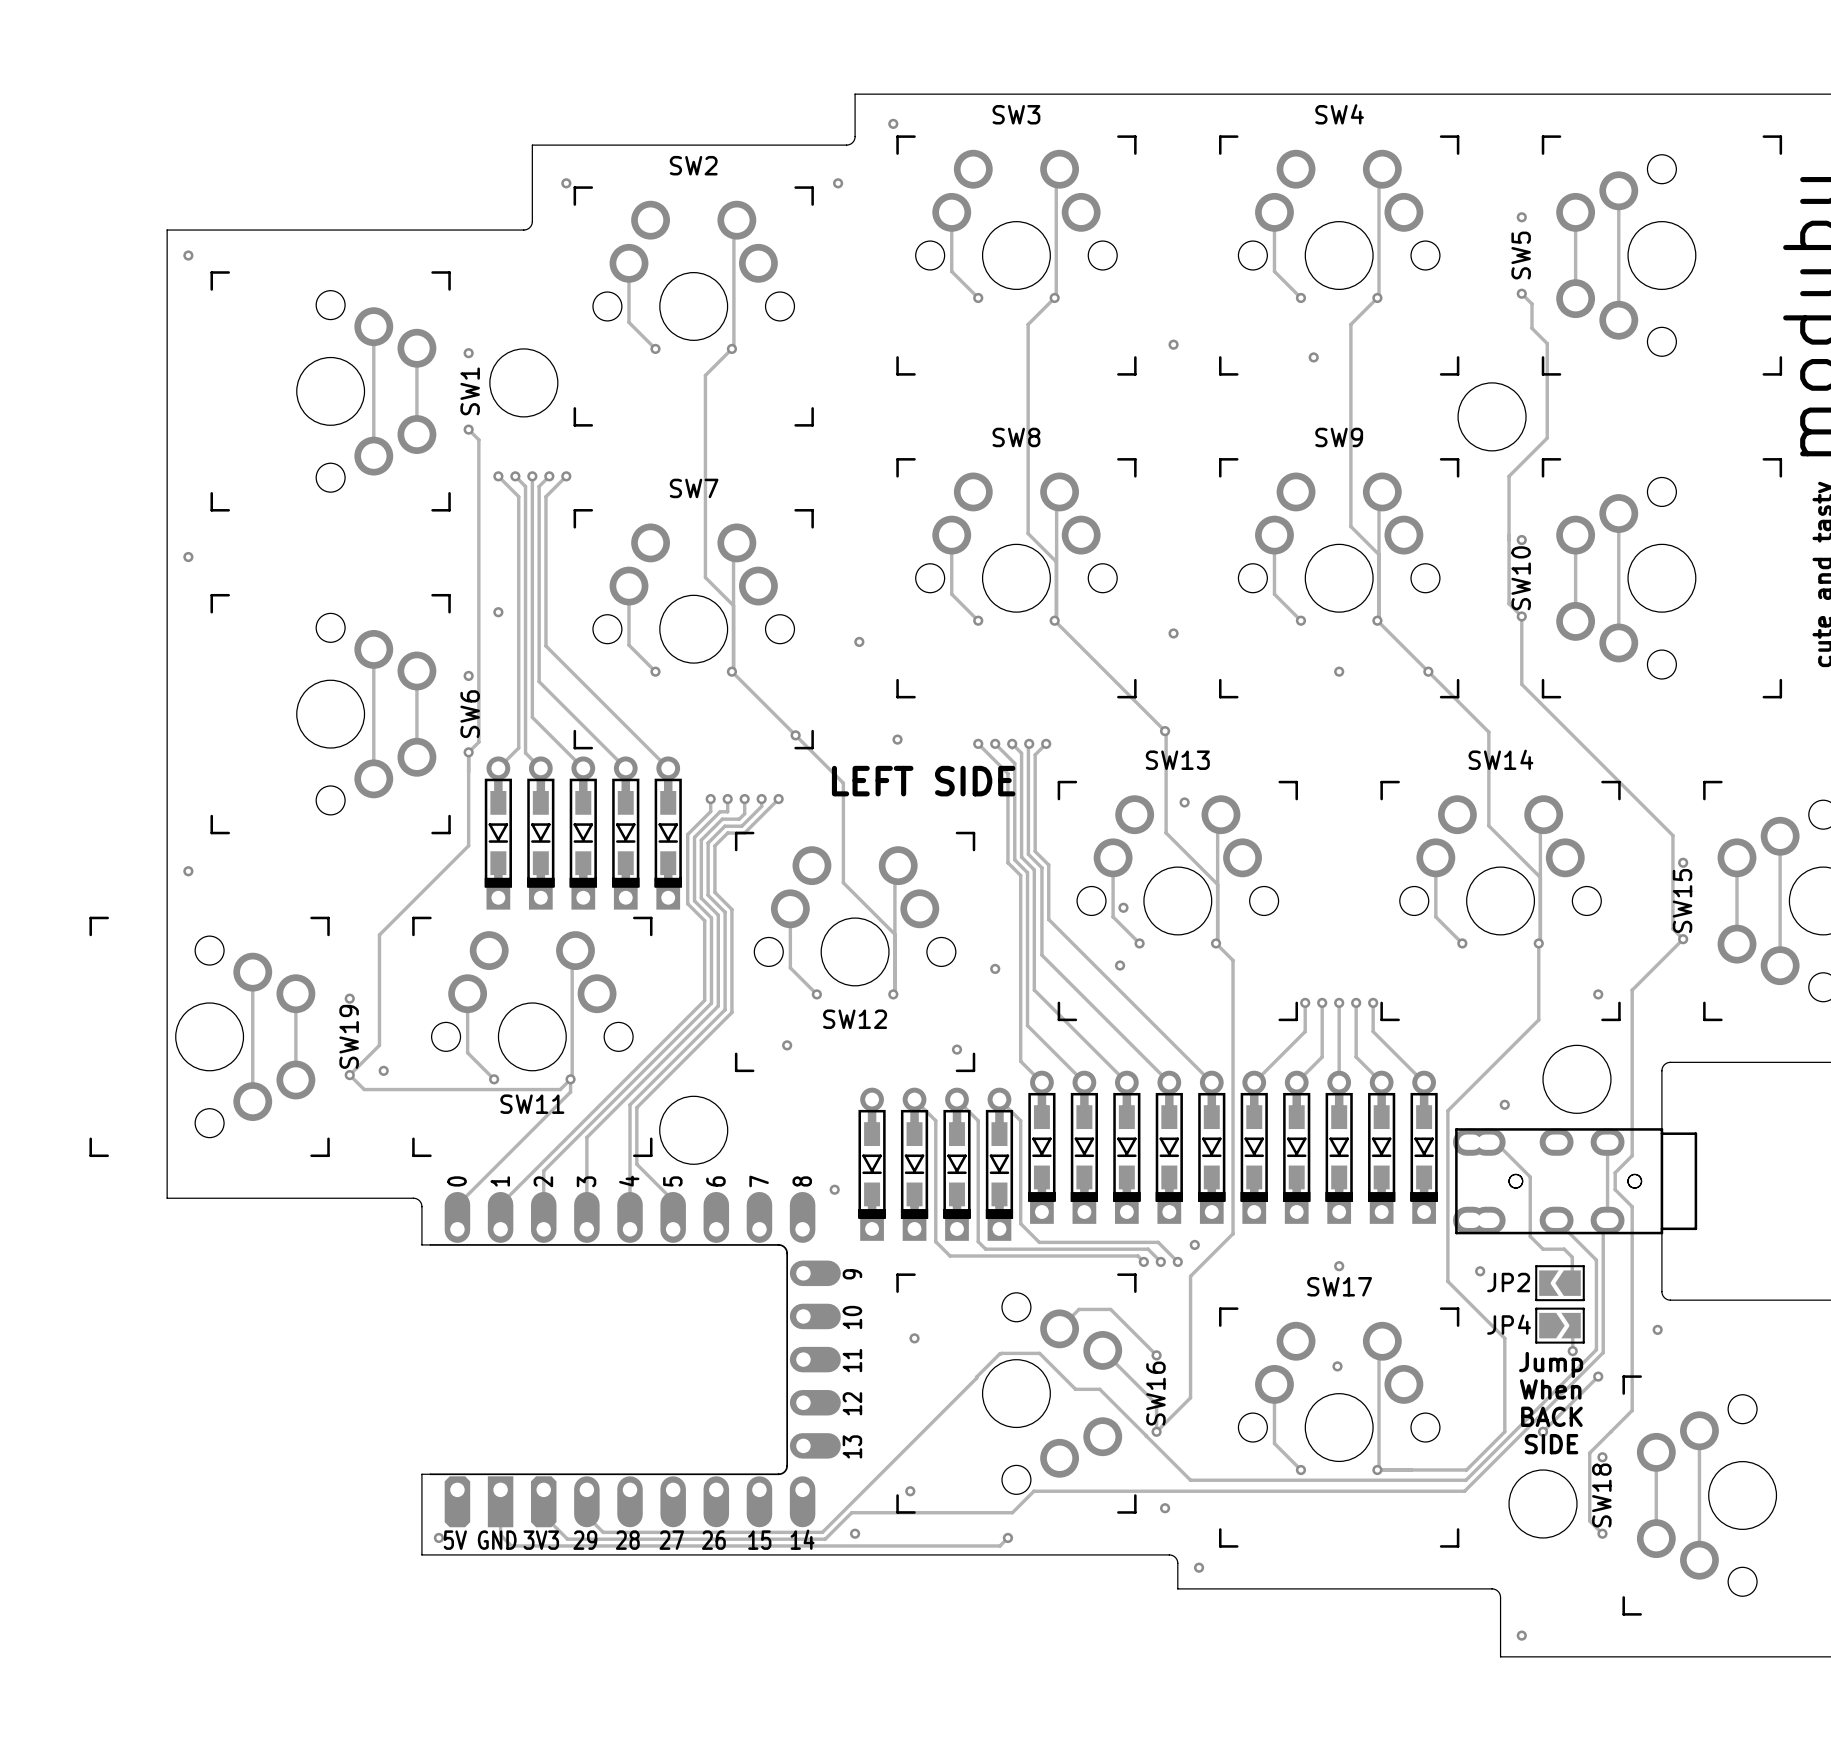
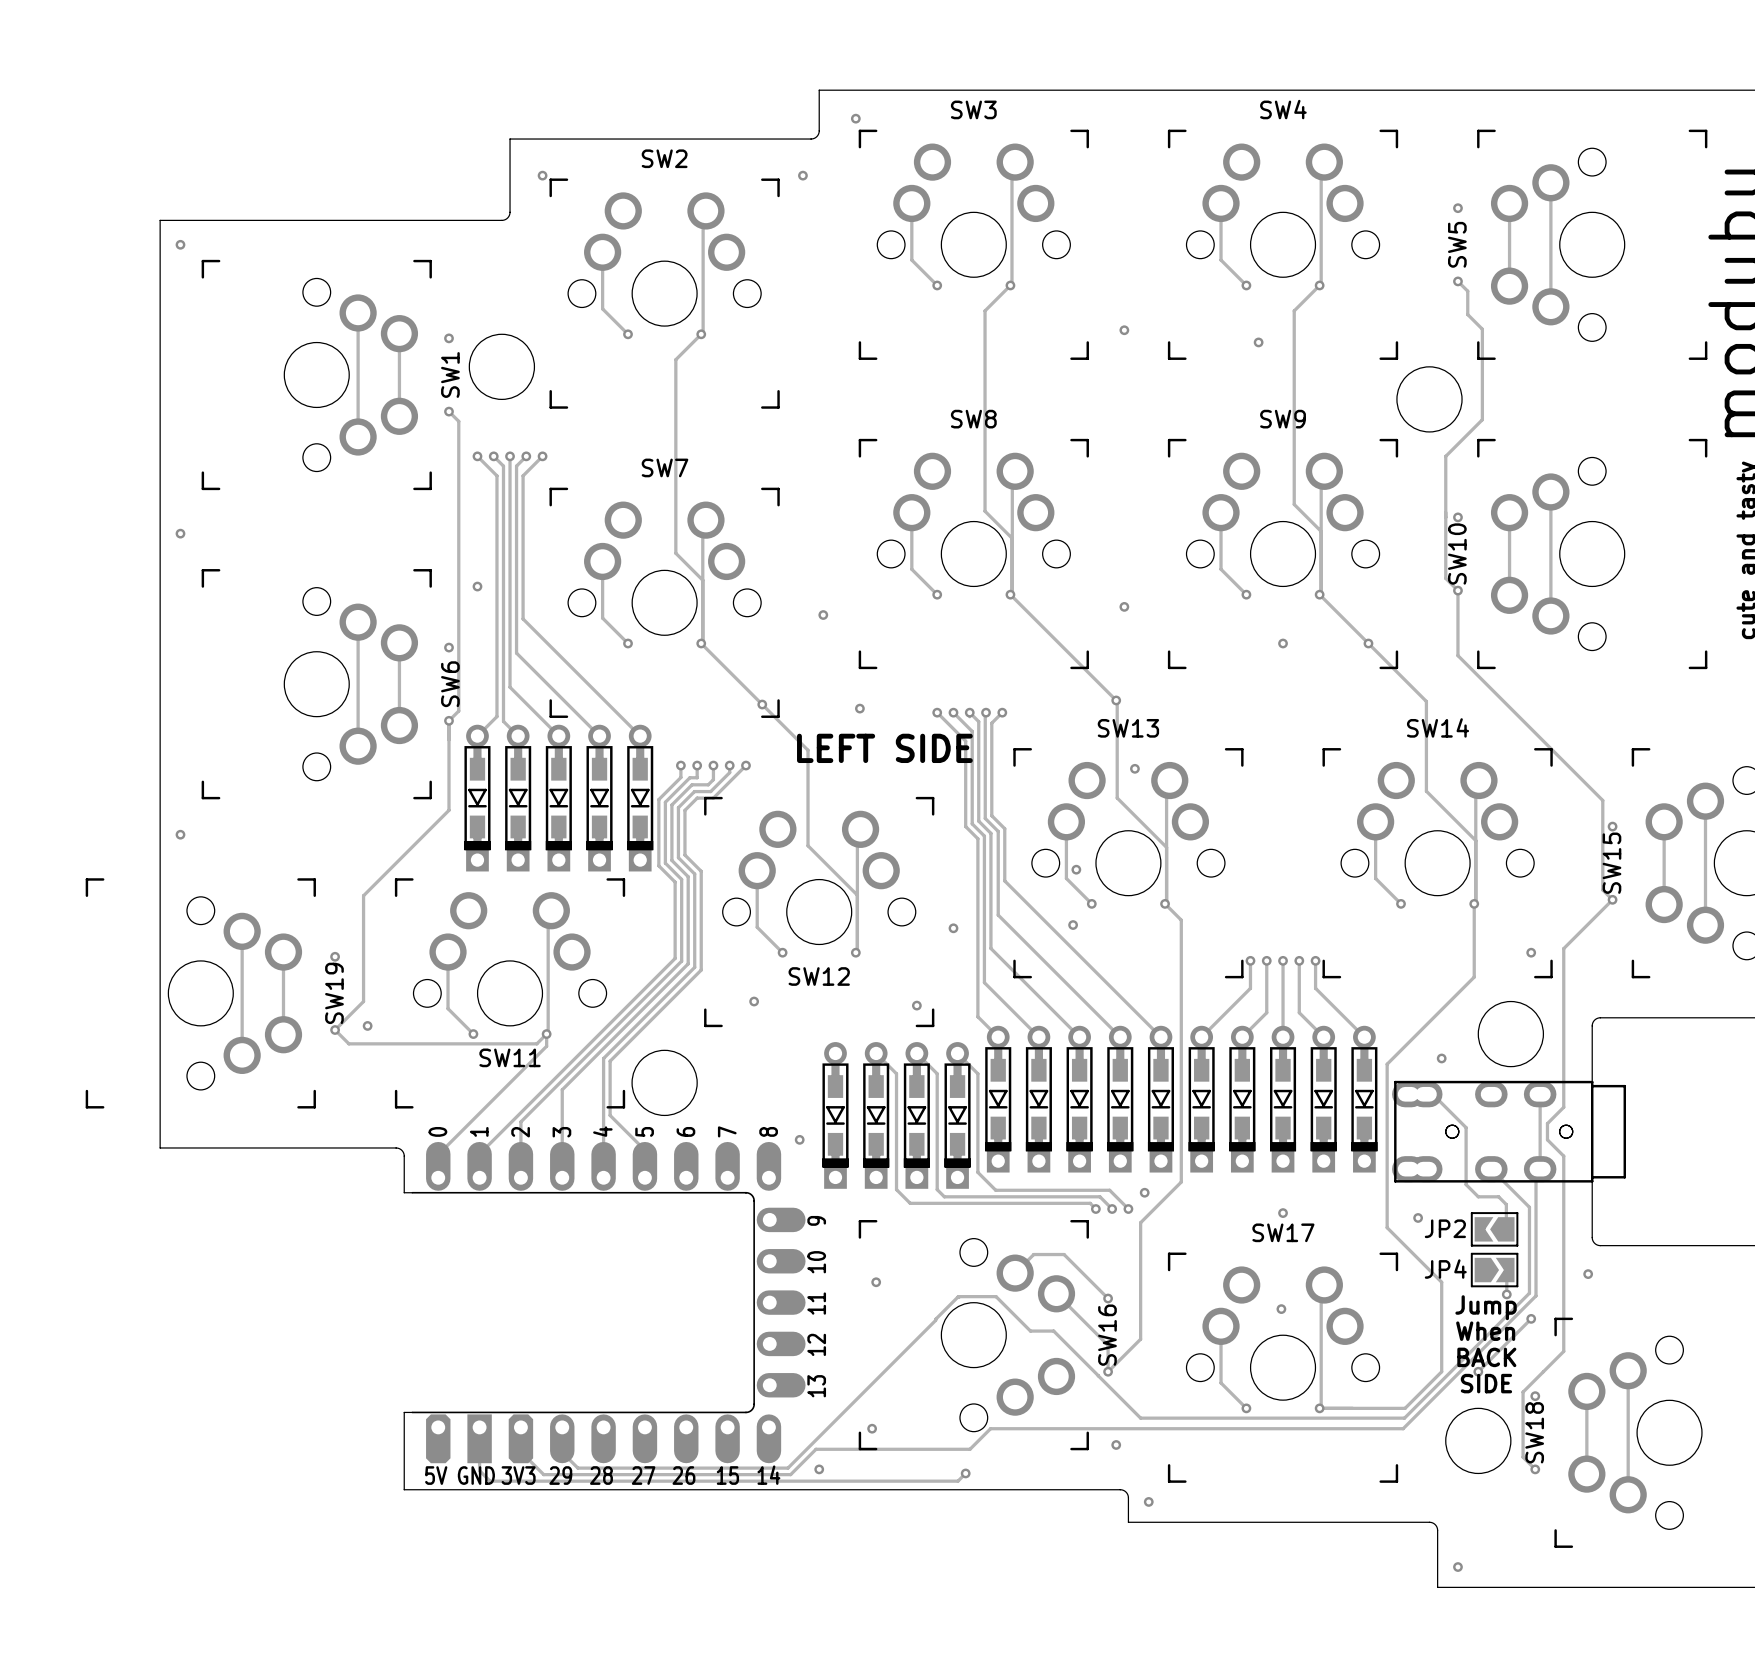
via: (438, 1537) -> none

